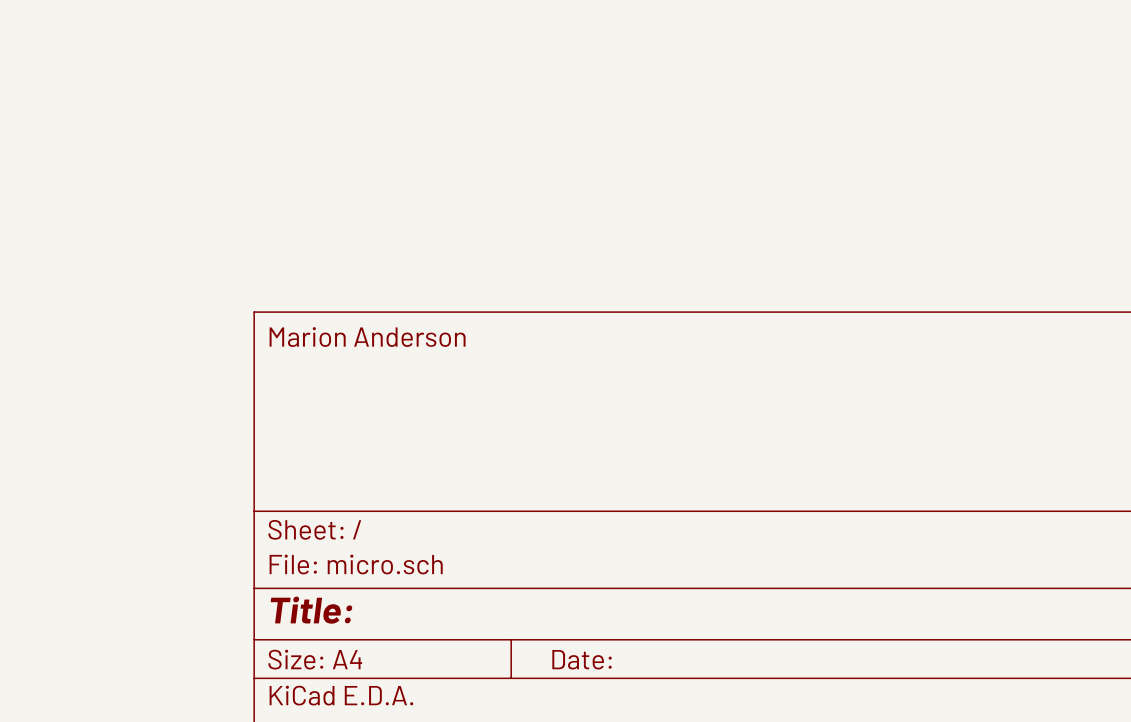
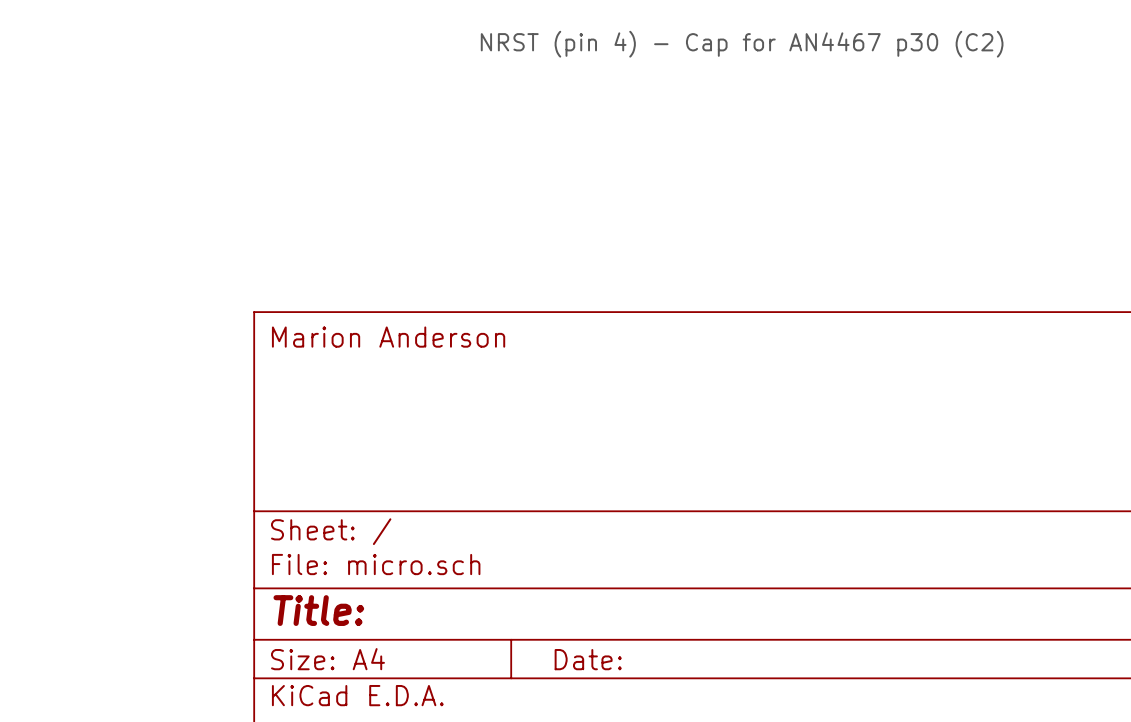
text: none -> NRST (pin 4) - Cap for AN4467 p30 (C2) (742, 44)

